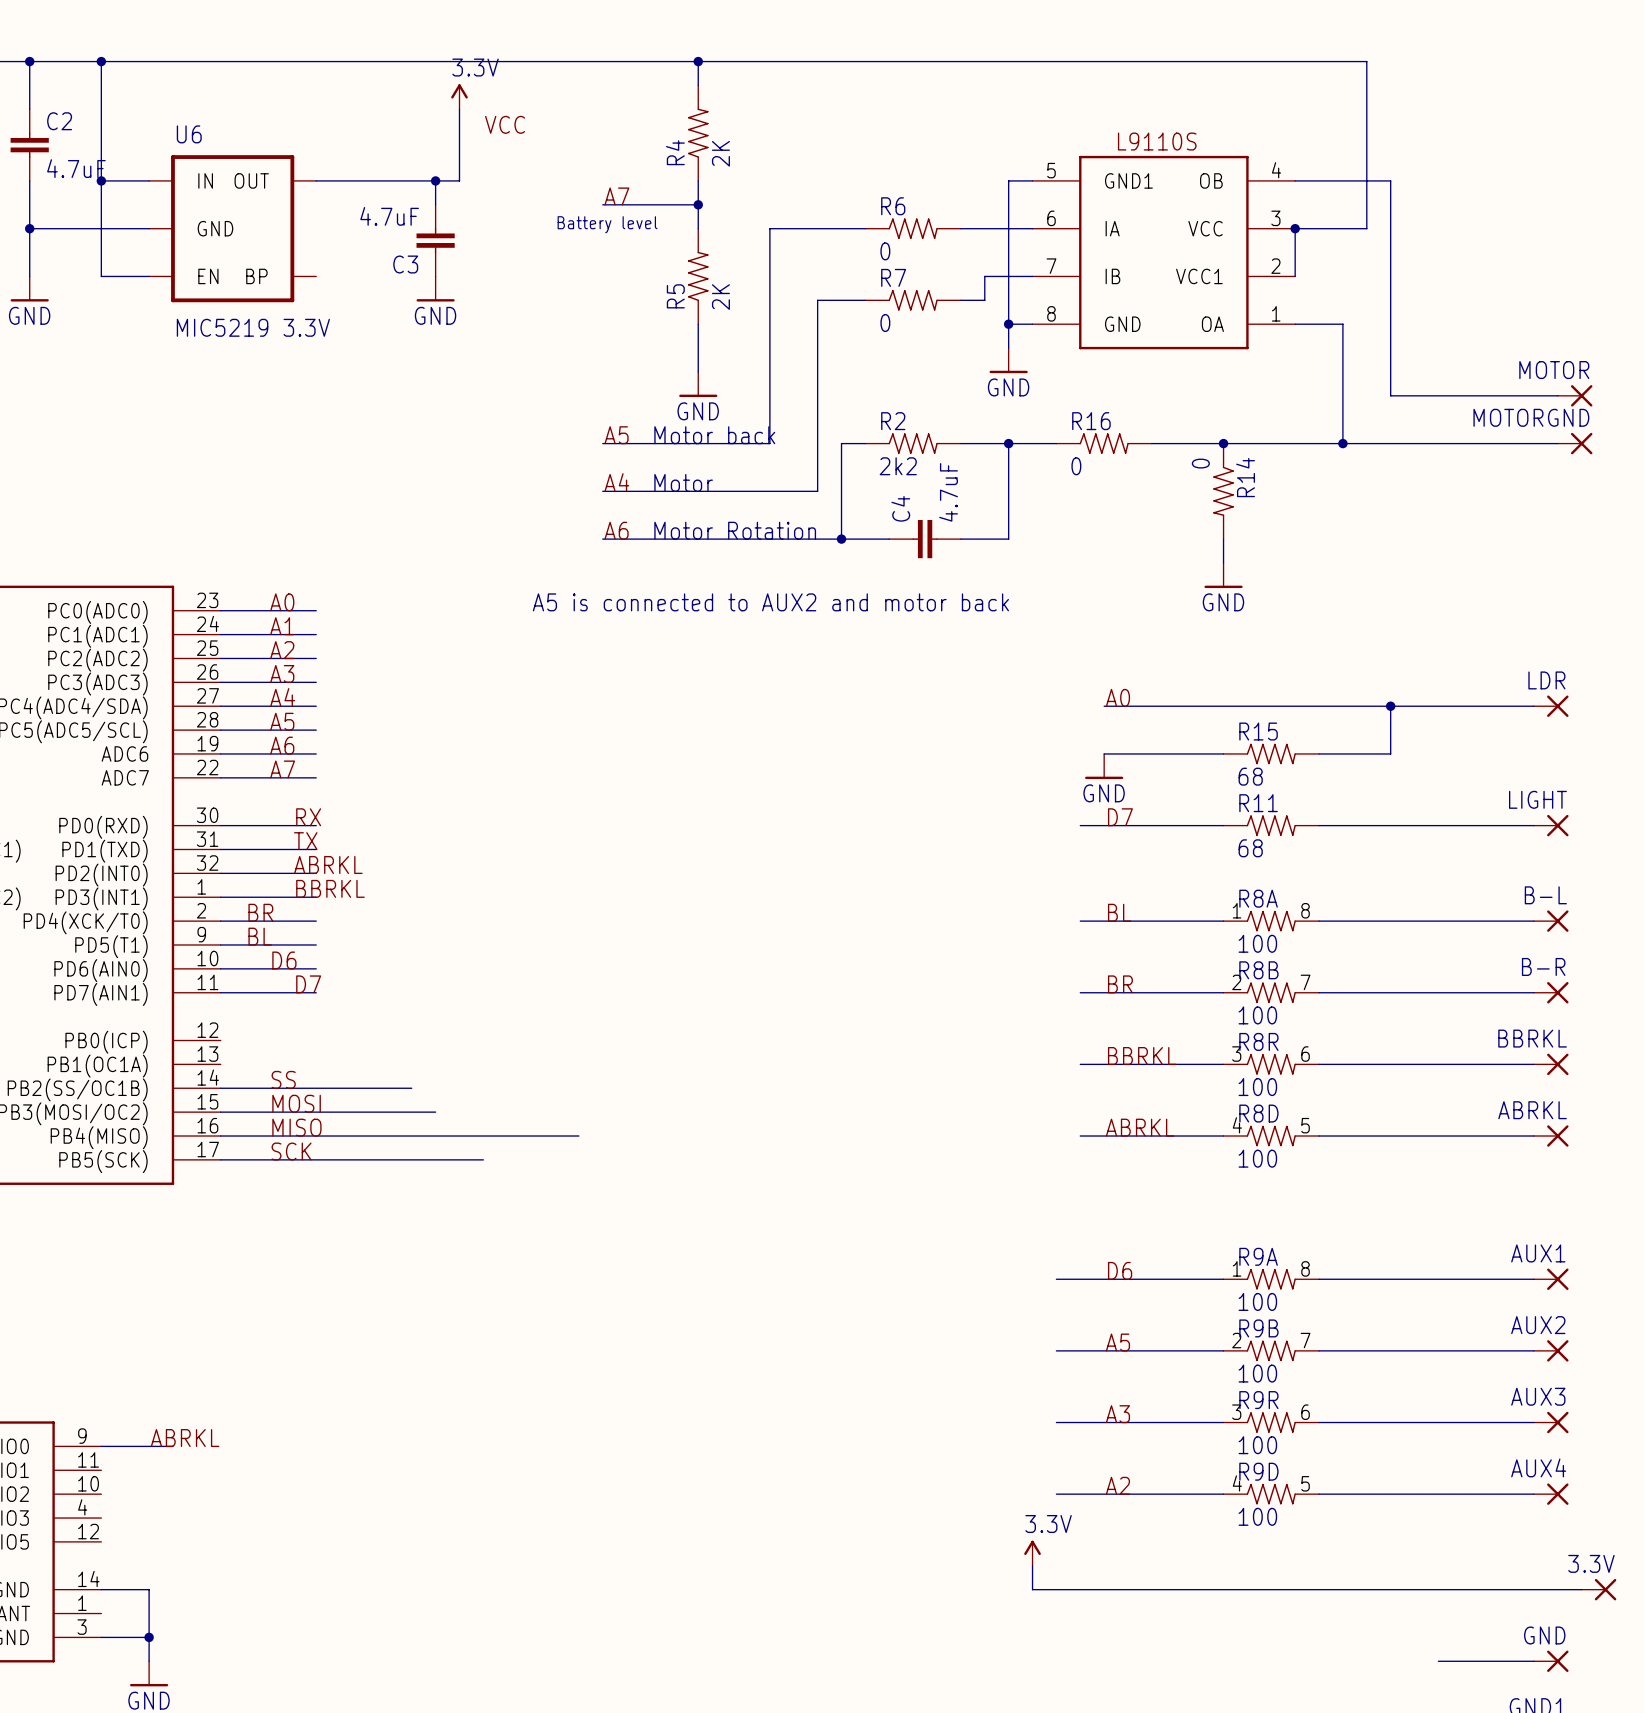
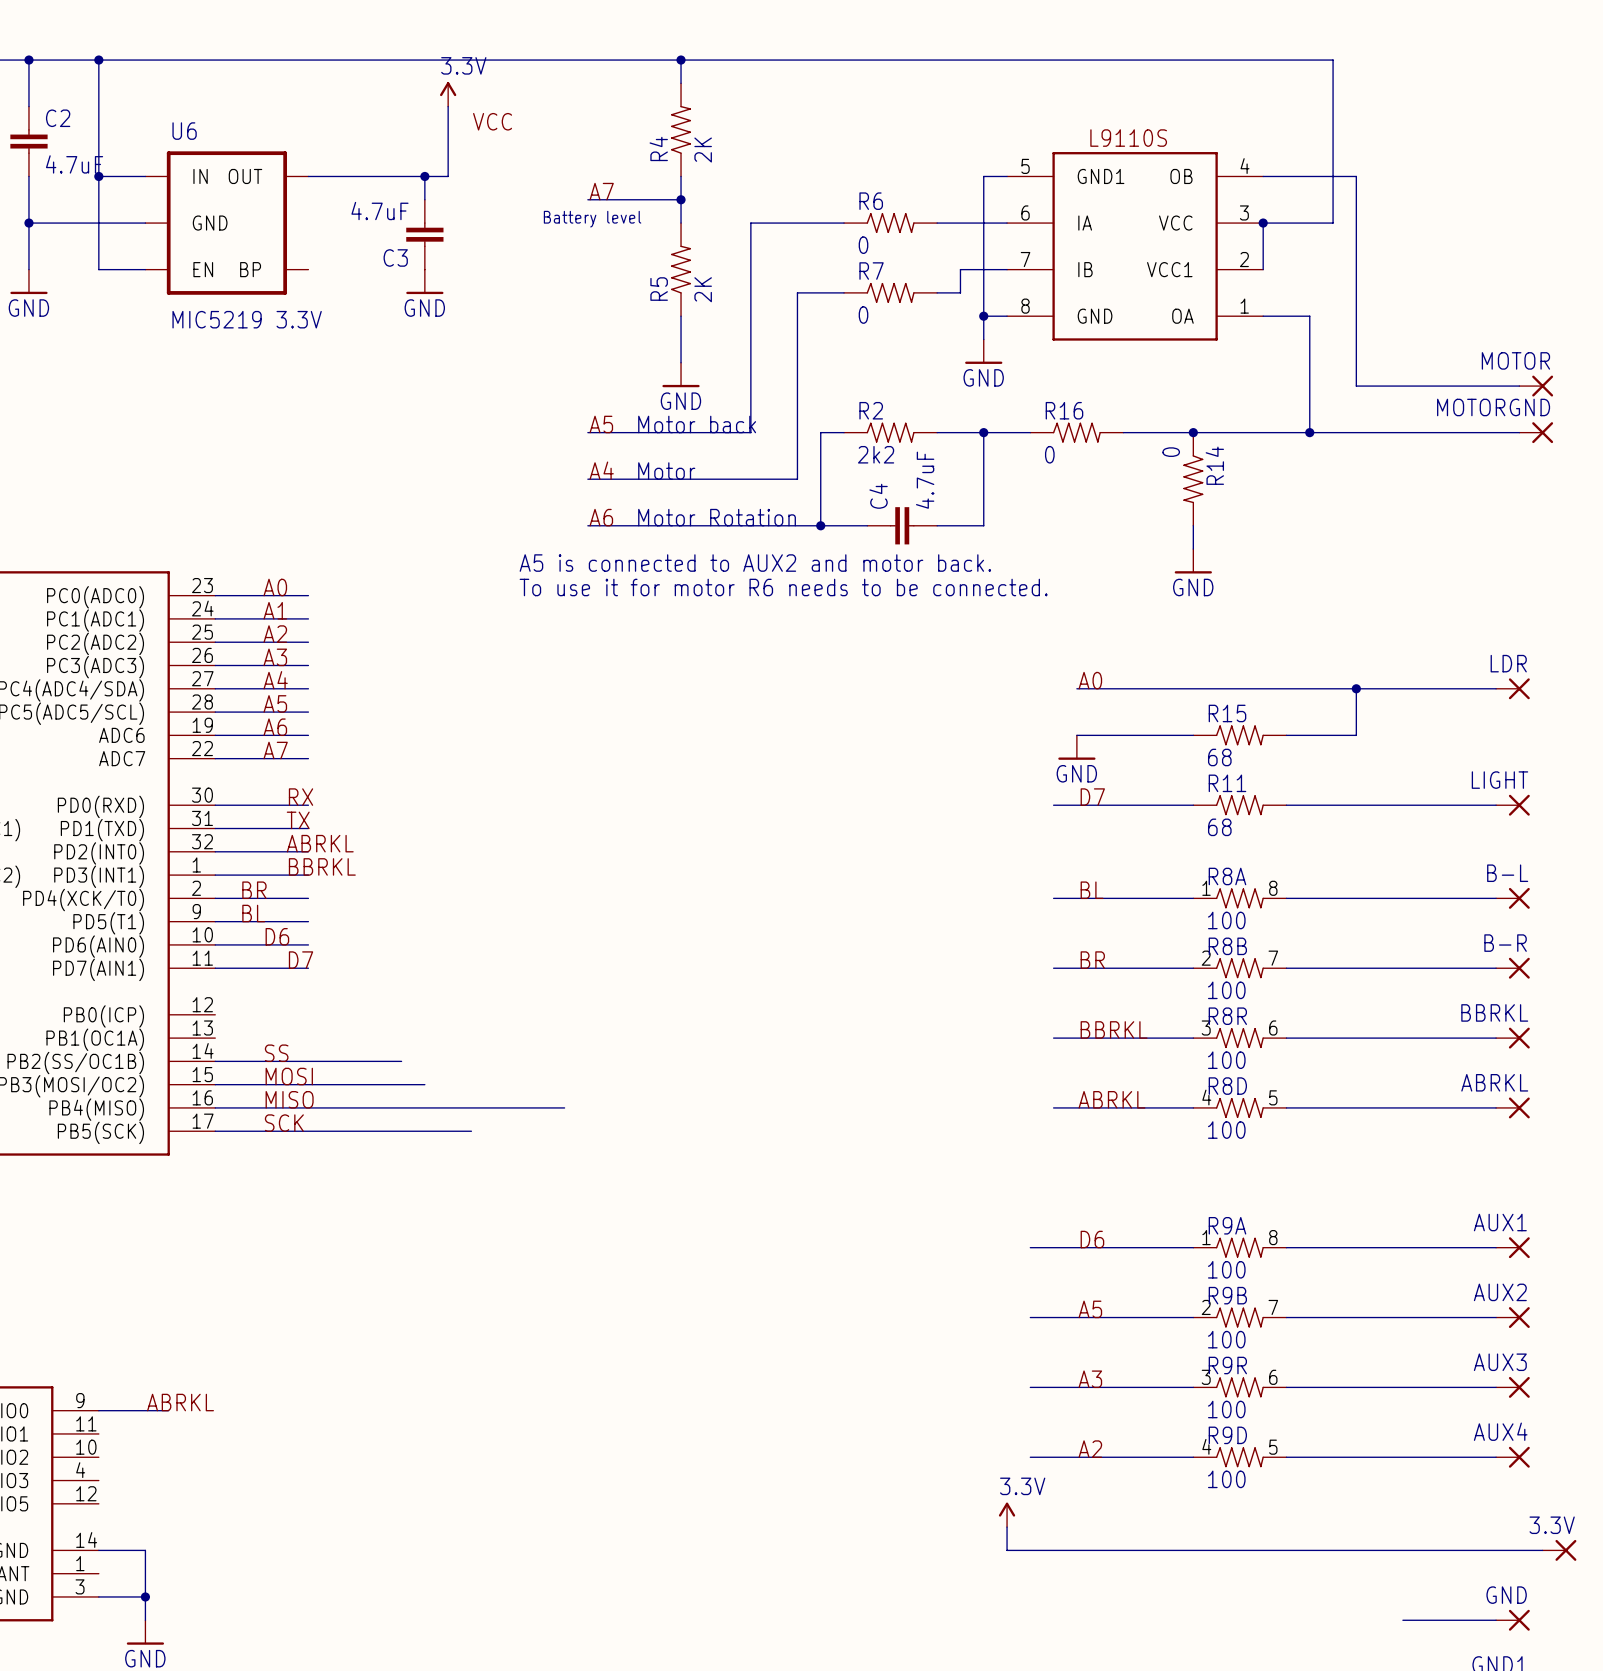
text: none -> A5 is connected to AUX2 and motor back. (755, 563)
text: A5 is connected to AUX2 and motor back (770, 602) -> To use it for motor R6 needs to be connected. (783, 587)

